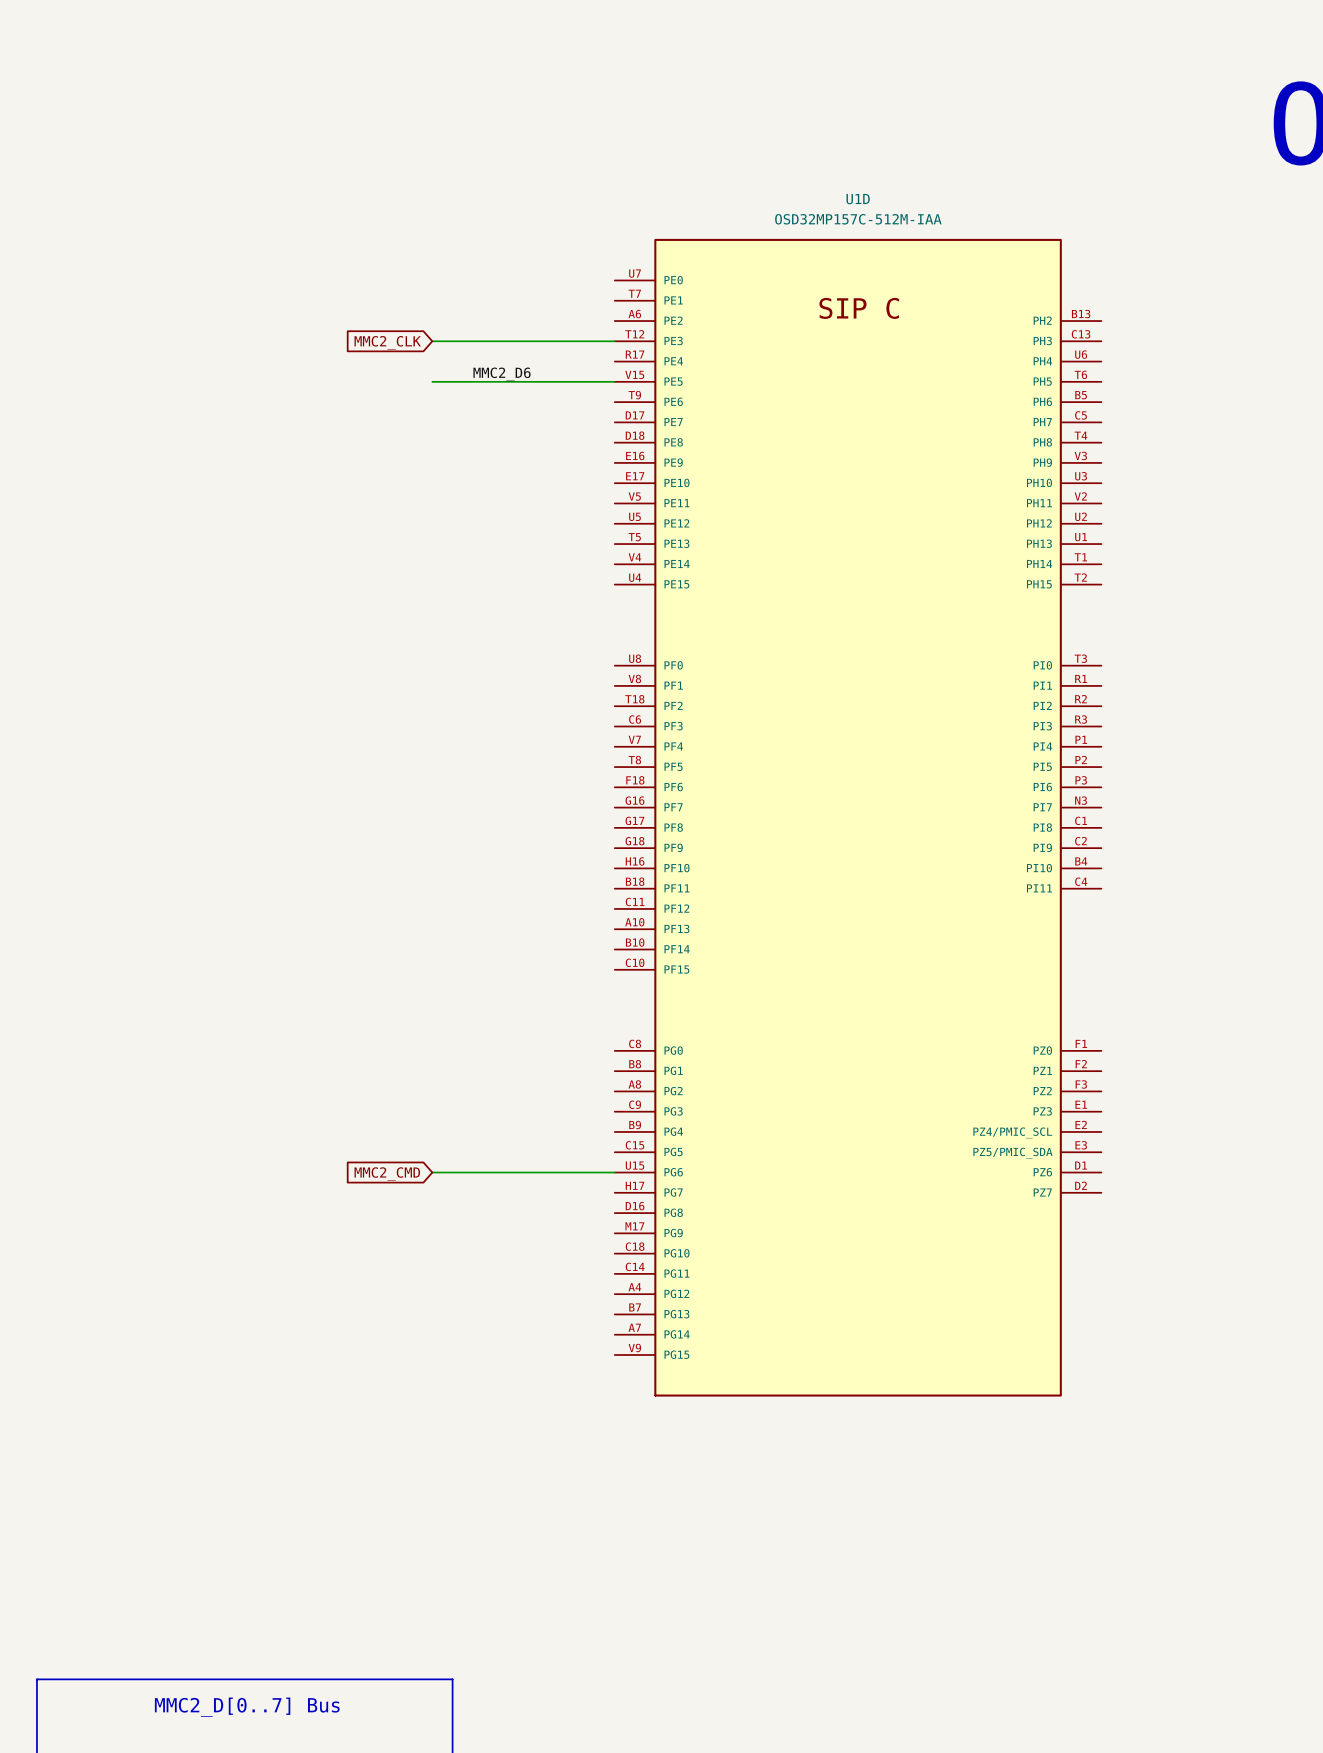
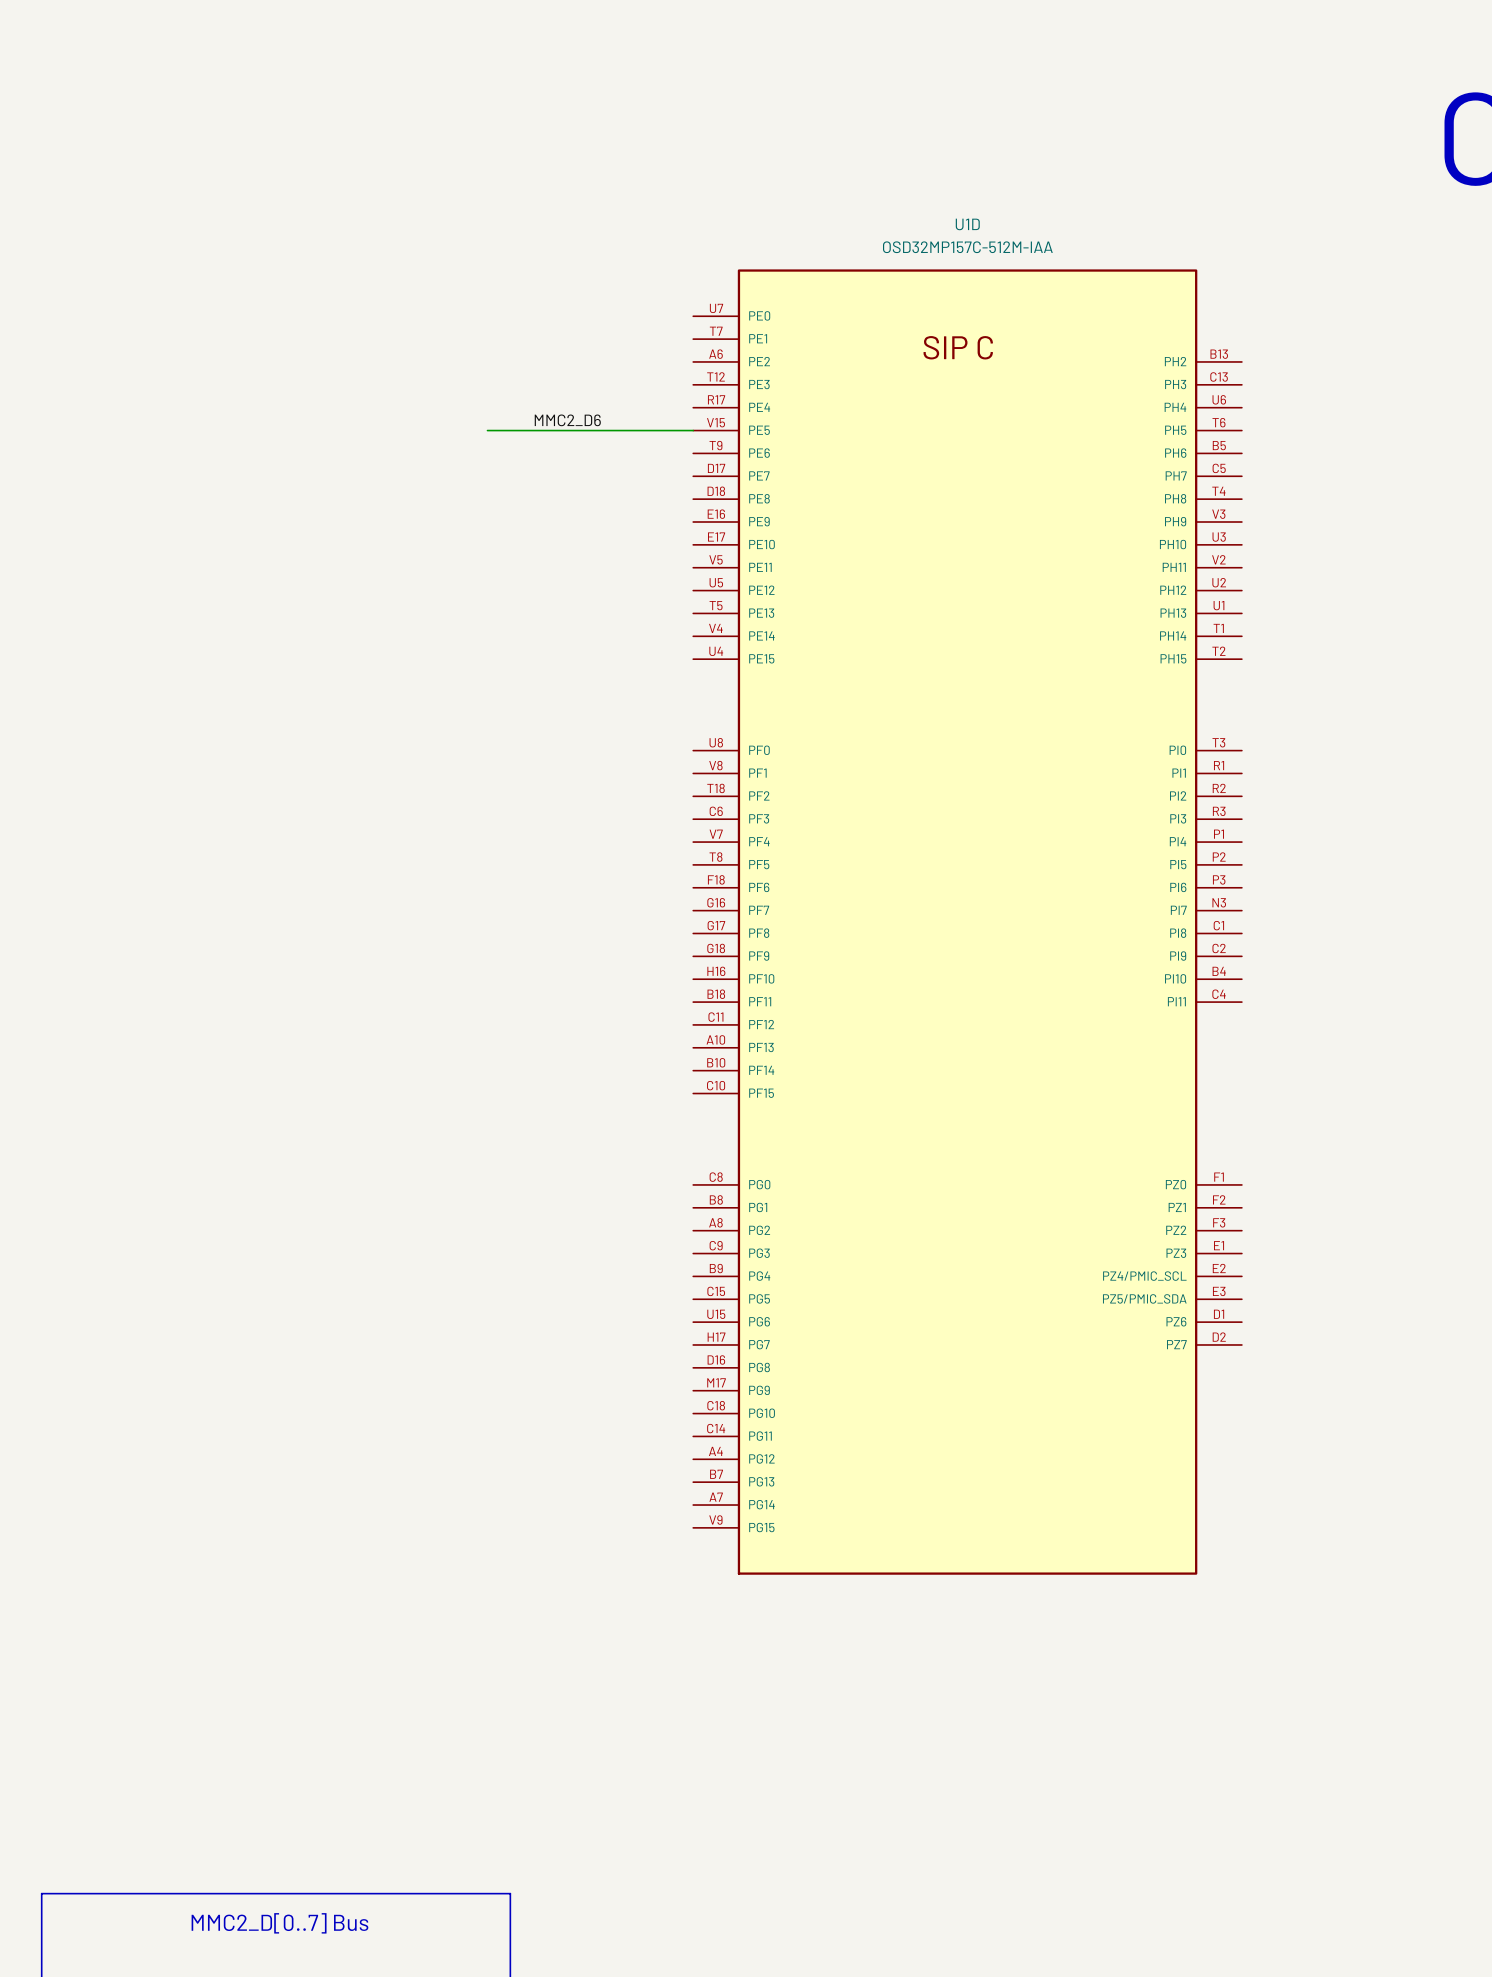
wire: (432, 341) (614, 341) -> none
global label: MMC2_CLK (387, 342) -> none
wire: (432, 1172) (614, 1172) -> none
global label: MMC2_CMD (387, 1174) -> none

